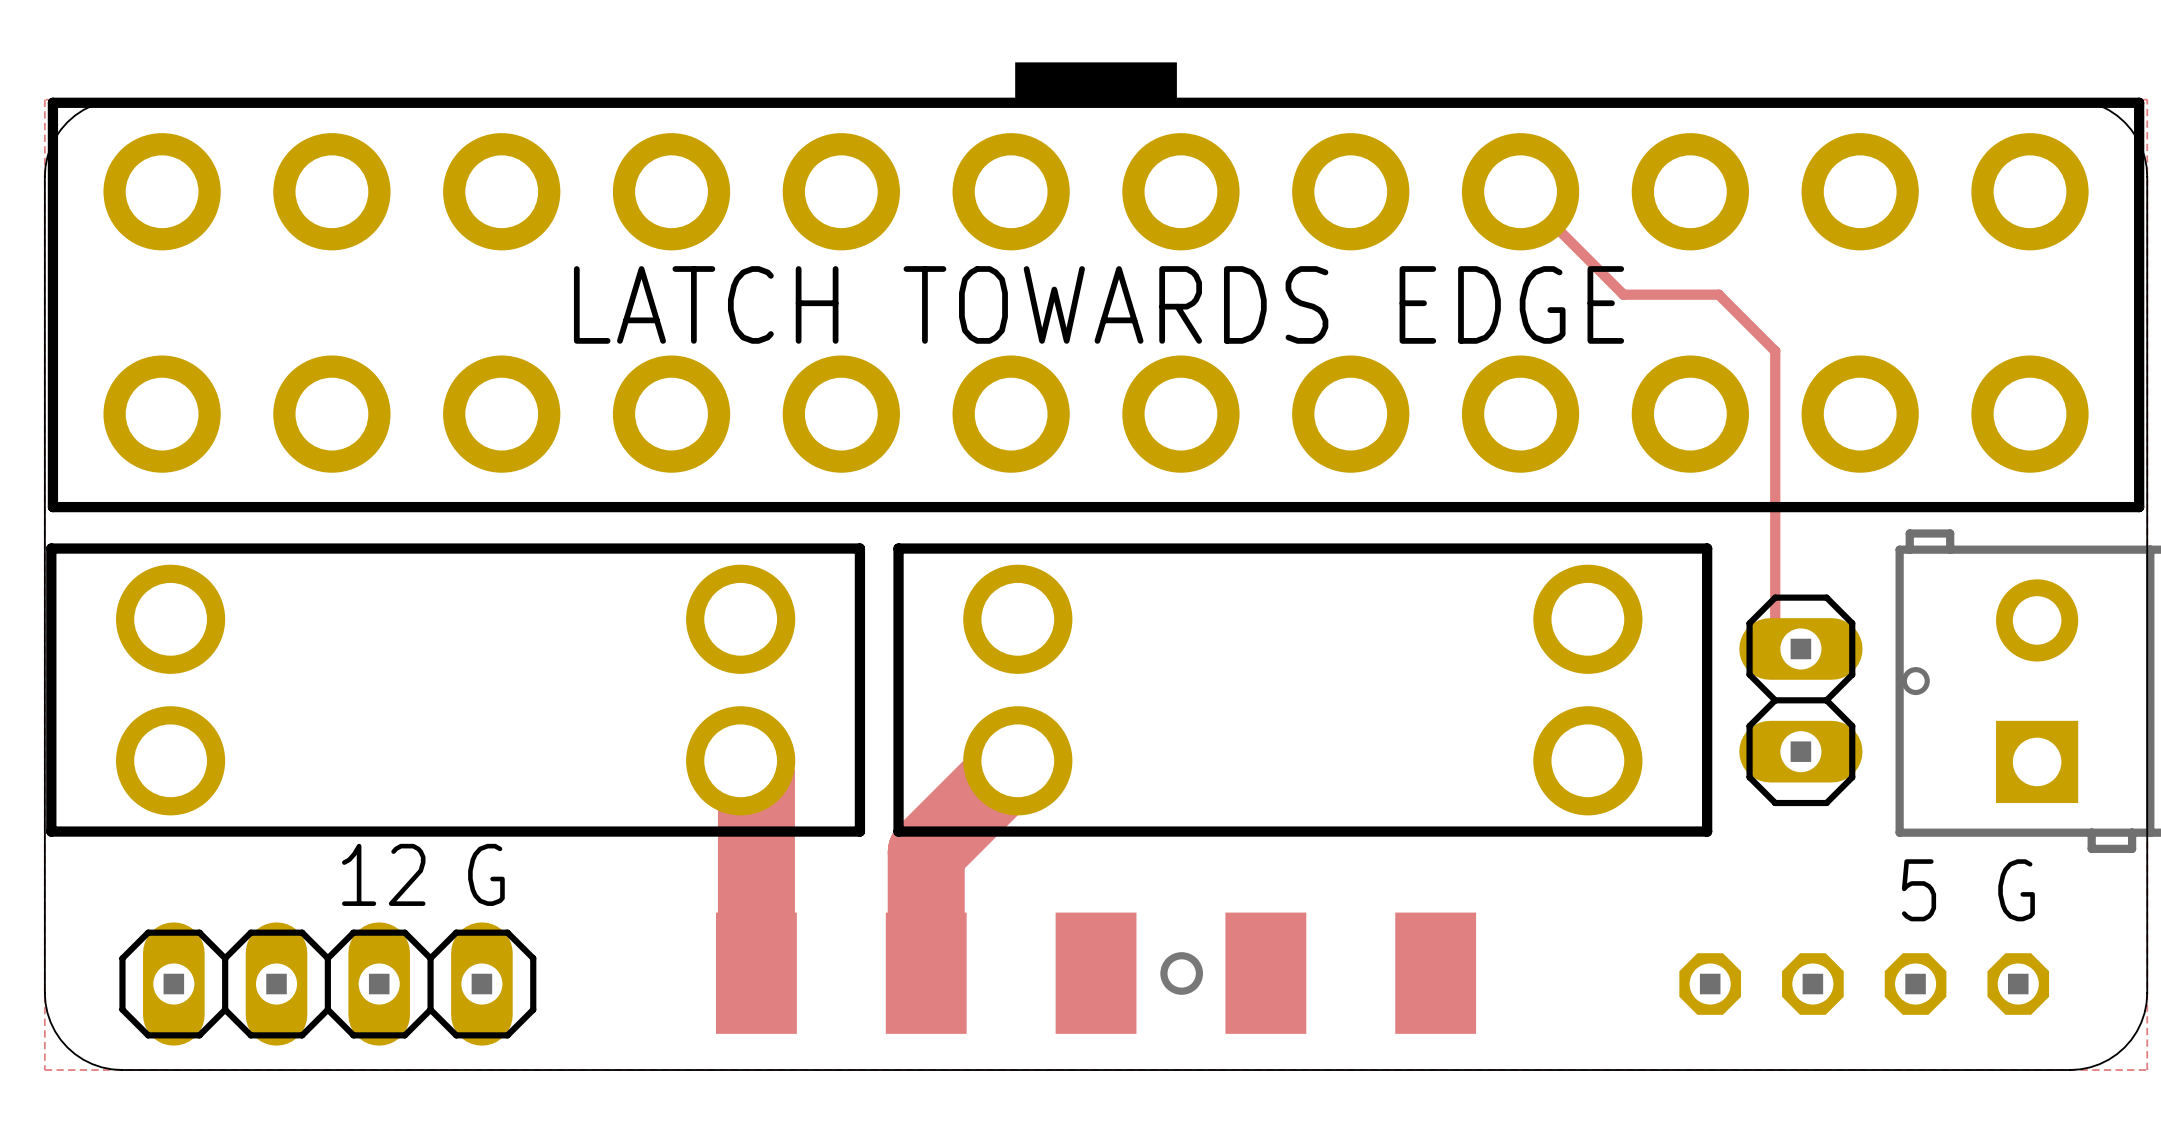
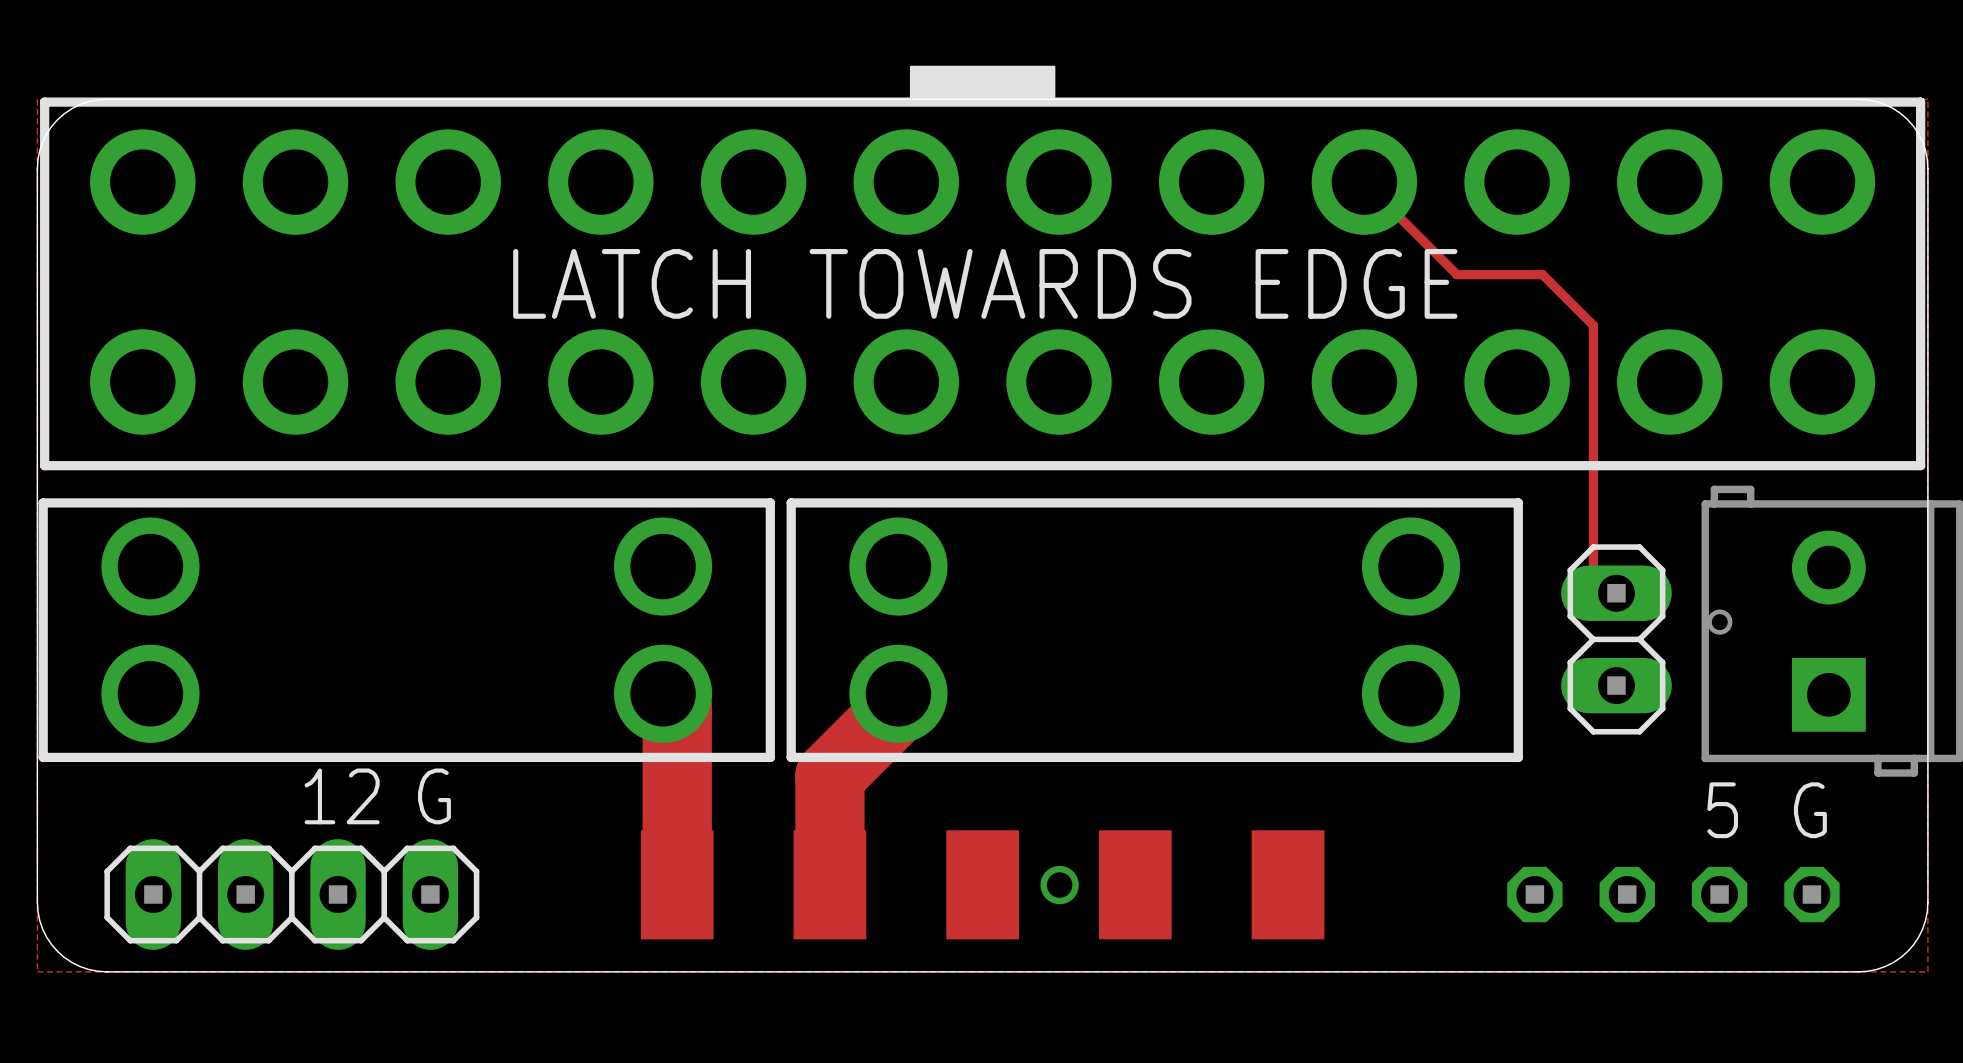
part position: (1302, 690) -> (1154, 630)

